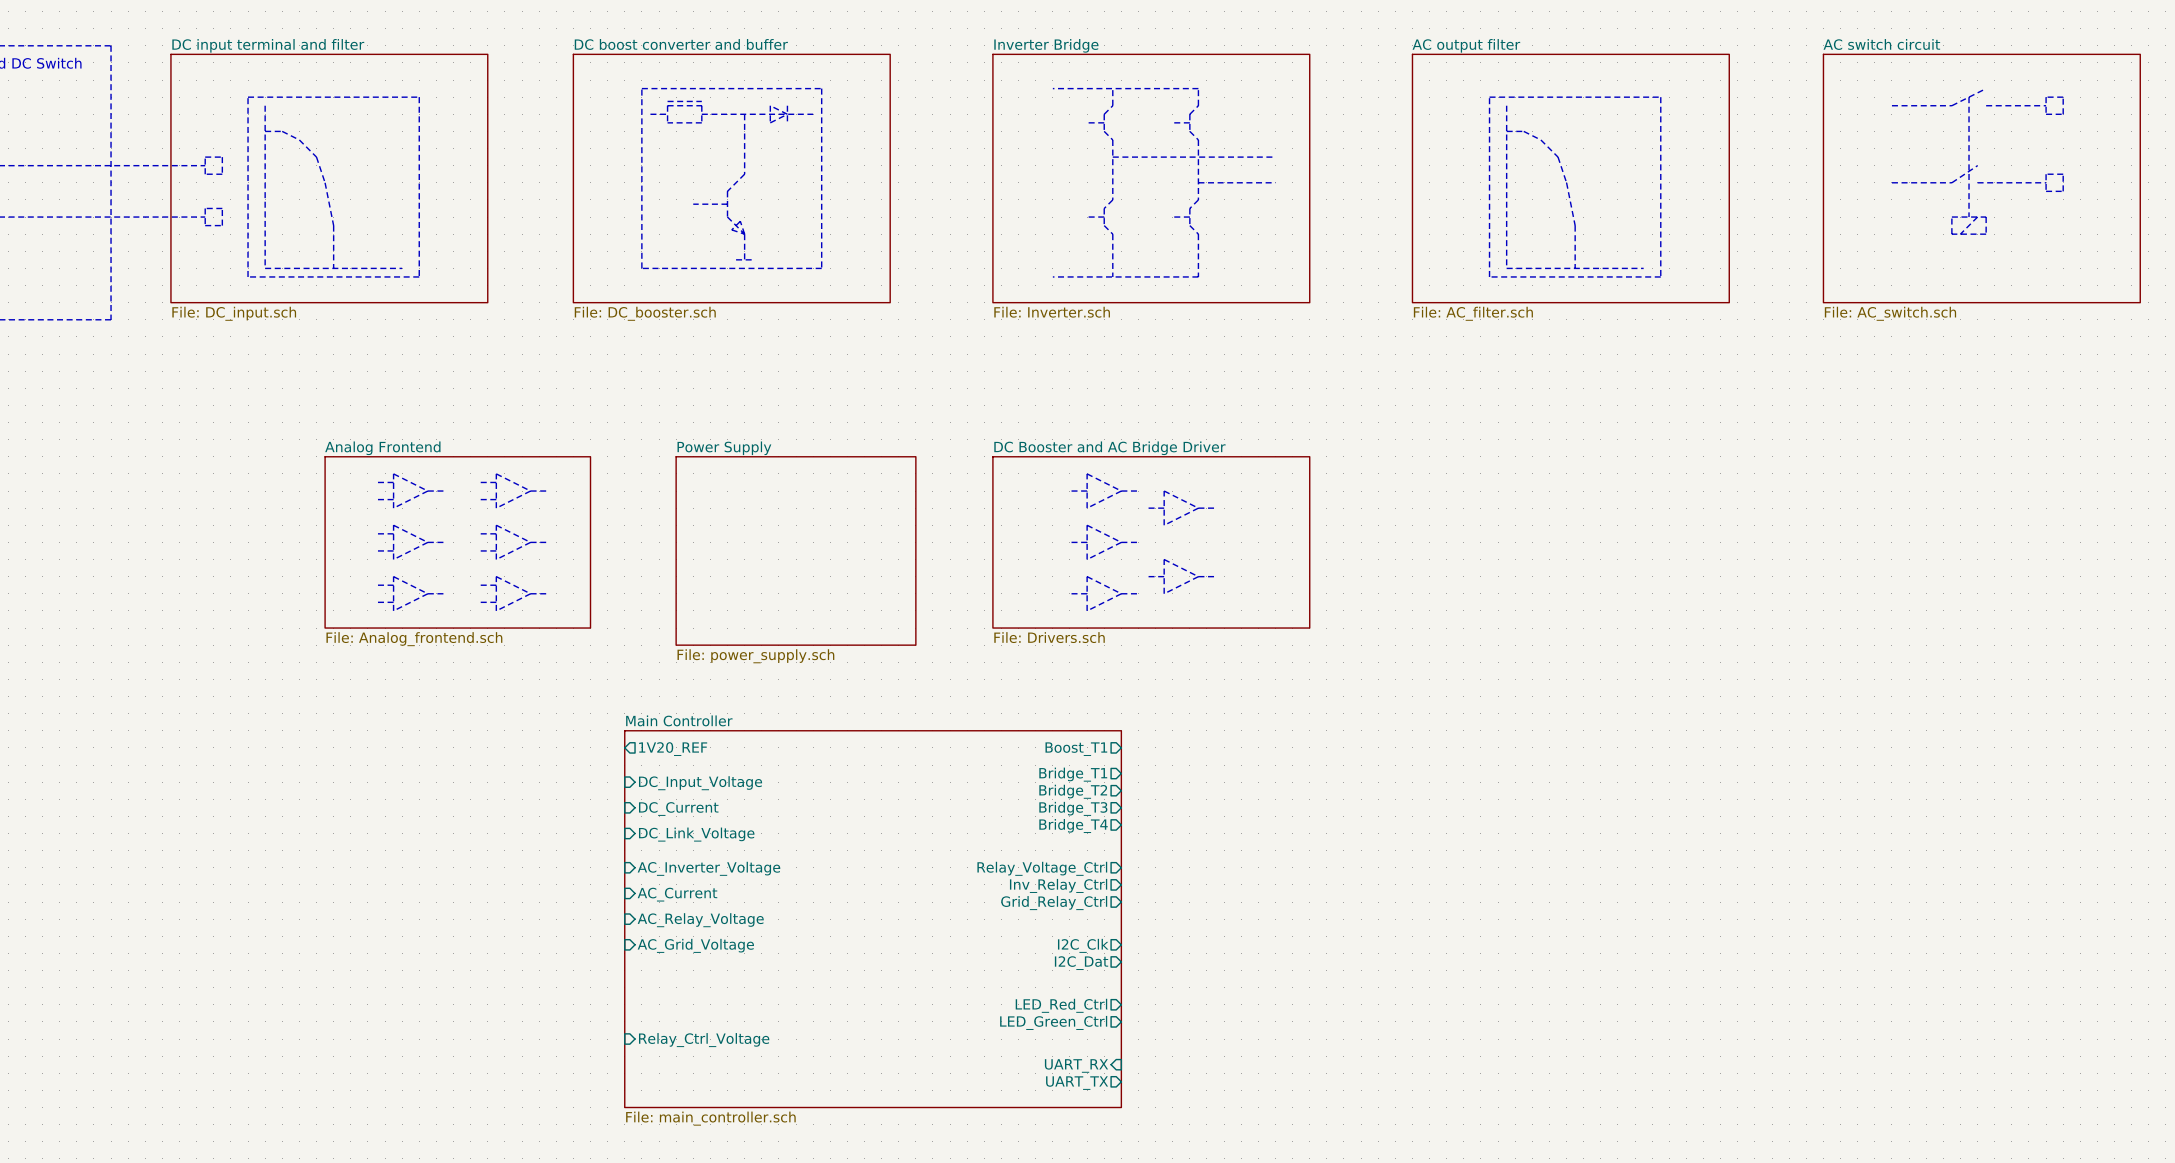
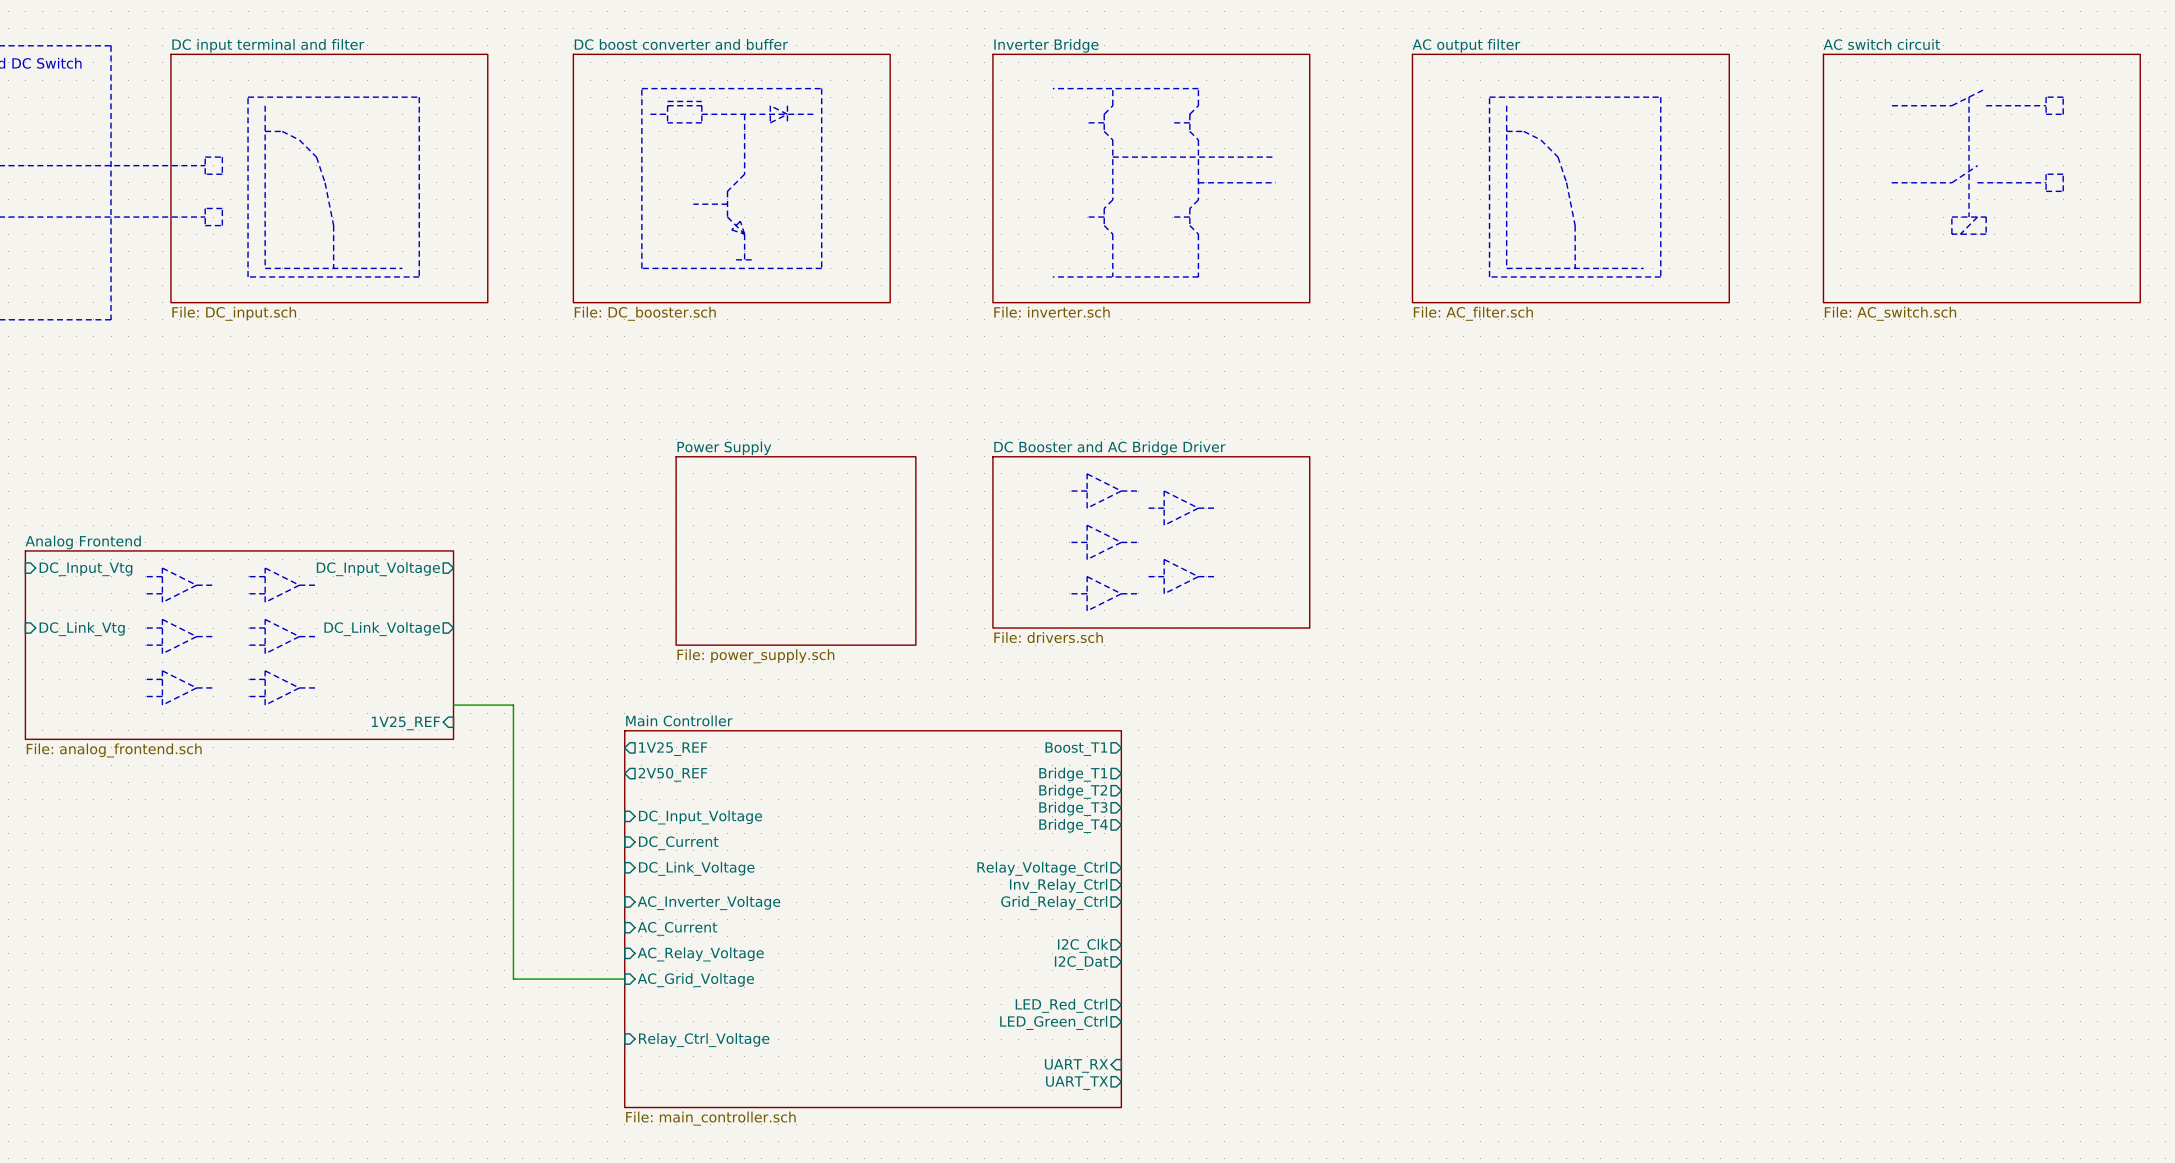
sheet Inverter Bridge value: File: Inverter.sch (1052, 312) -> File: inverter.sch (1052, 312)
line: (376, 482) (393, 482) -> (248, 576) (265, 576)
line: (479, 482) (496, 482) -> none
line: (427, 491) (393, 473) (393, 508) (427, 491) -> (299, 585) (265, 568) (265, 602) (299, 585)
line: (427, 491) (444, 491) -> (299, 585) (316, 585)
line: (530, 491) (547, 491) -> none
line: (530, 491) (496, 508) (496, 473) (530, 491) -> none
line: (376, 499) (393, 499) -> (248, 593) (265, 593)
line: (479, 499) (496, 499) -> none
line: (376, 533) (393, 533) -> (248, 628) (265, 628)
line: (479, 533) (496, 533) -> none
line: (427, 542) (393, 525) (393, 559) (427, 542) -> (299, 636) (265, 619) (265, 653) (299, 636)
line: (427, 542) (444, 542) -> (299, 636) (316, 636)
sheet Analog Frontend: File: Analog_frontend.sch (457, 542) -> none
line: (530, 542) (496, 525) (496, 559) (530, 542) -> none
line: (530, 542) (547, 542) -> none
line: (376, 550) (393, 550) -> (248, 645) (265, 645)
line: (479, 550) (496, 550) -> none
sheet pin: none -> DC_Input_Vtg (85, 569)
sheet pin: none -> DC_Input_Voltage (378, 569)
line: none -> (145, 576) (162, 576)
line: none -> (196, 585) (162, 568) (162, 602) (196, 585)
line: none -> (196, 585) (213, 585)
line: (376, 585) (393, 585) -> (248, 679) (265, 679)
line: (479, 585) (496, 585) -> none
line: none -> (145, 593) (162, 593)
line: (427, 593) (393, 576) (393, 610) (427, 593) -> (299, 687) (265, 670) (265, 705) (299, 687)
line: (427, 593) (444, 593) -> (299, 687) (316, 687)
line: (530, 593) (496, 576) (496, 610) (530, 593) -> none
line: (530, 593) (547, 593) -> none
line: (376, 602) (393, 602) -> (248, 696) (265, 696)
line: (479, 602) (496, 602) -> none
line: none -> (145, 628) (162, 628)
sheet pin: none -> DC_Link_Vtg (82, 629)
sheet pin: none -> DC_Link_Voltage (382, 629)
line: none -> (196, 636) (162, 619) (162, 653) (196, 636)
line: none -> (196, 636) (213, 636)
sheet DC Booster and AC Bridge Driver value: File: Drivers.sch (1049, 637) -> File: drivers.sch (1048, 637)
line: none -> (145, 645) (162, 645)
sheet Analog Frontend: none -> File: analog_frontend.sch (239, 645)
line: none -> (145, 679) (162, 679)
line: none -> (196, 687) (162, 670) (162, 705) (196, 687)
line: none -> (196, 687) (213, 687)
line: none -> (145, 696) (162, 696)
wire: none -> (453, 705) (513, 705) (513, 979) (624, 979)
sheet pin: none -> 1V25_REF (405, 723)
sheet pin: 1V20_REF (673, 749) -> 1V25_REF (673, 749)
sheet pin: none -> 2V50_REF (672, 774)
sheet pin position: DC_Input_Voltage (700, 783) -> DC_Input_Voltage (700, 817)
sheet pin position: DC_Current (678, 809) -> DC_Current (678, 843)
sheet pin: DC_Link_Voltage (696, 834) -> none
sheet pin: AC_Inverter_Voltage (708, 868) -> DC_Link_Voltage (696, 868)
sheet pin position: AC_Current (677, 894) -> AC_Current (677, 928)
sheet pin: none -> AC_Inverter_Voltage (708, 903)
sheet pin position: AC_Relay_Voltage (700, 920) -> AC_Relay_Voltage (700, 954)
sheet pin position: AC_Grid_Voltage (695, 945) -> AC_Grid_Voltage (695, 980)

